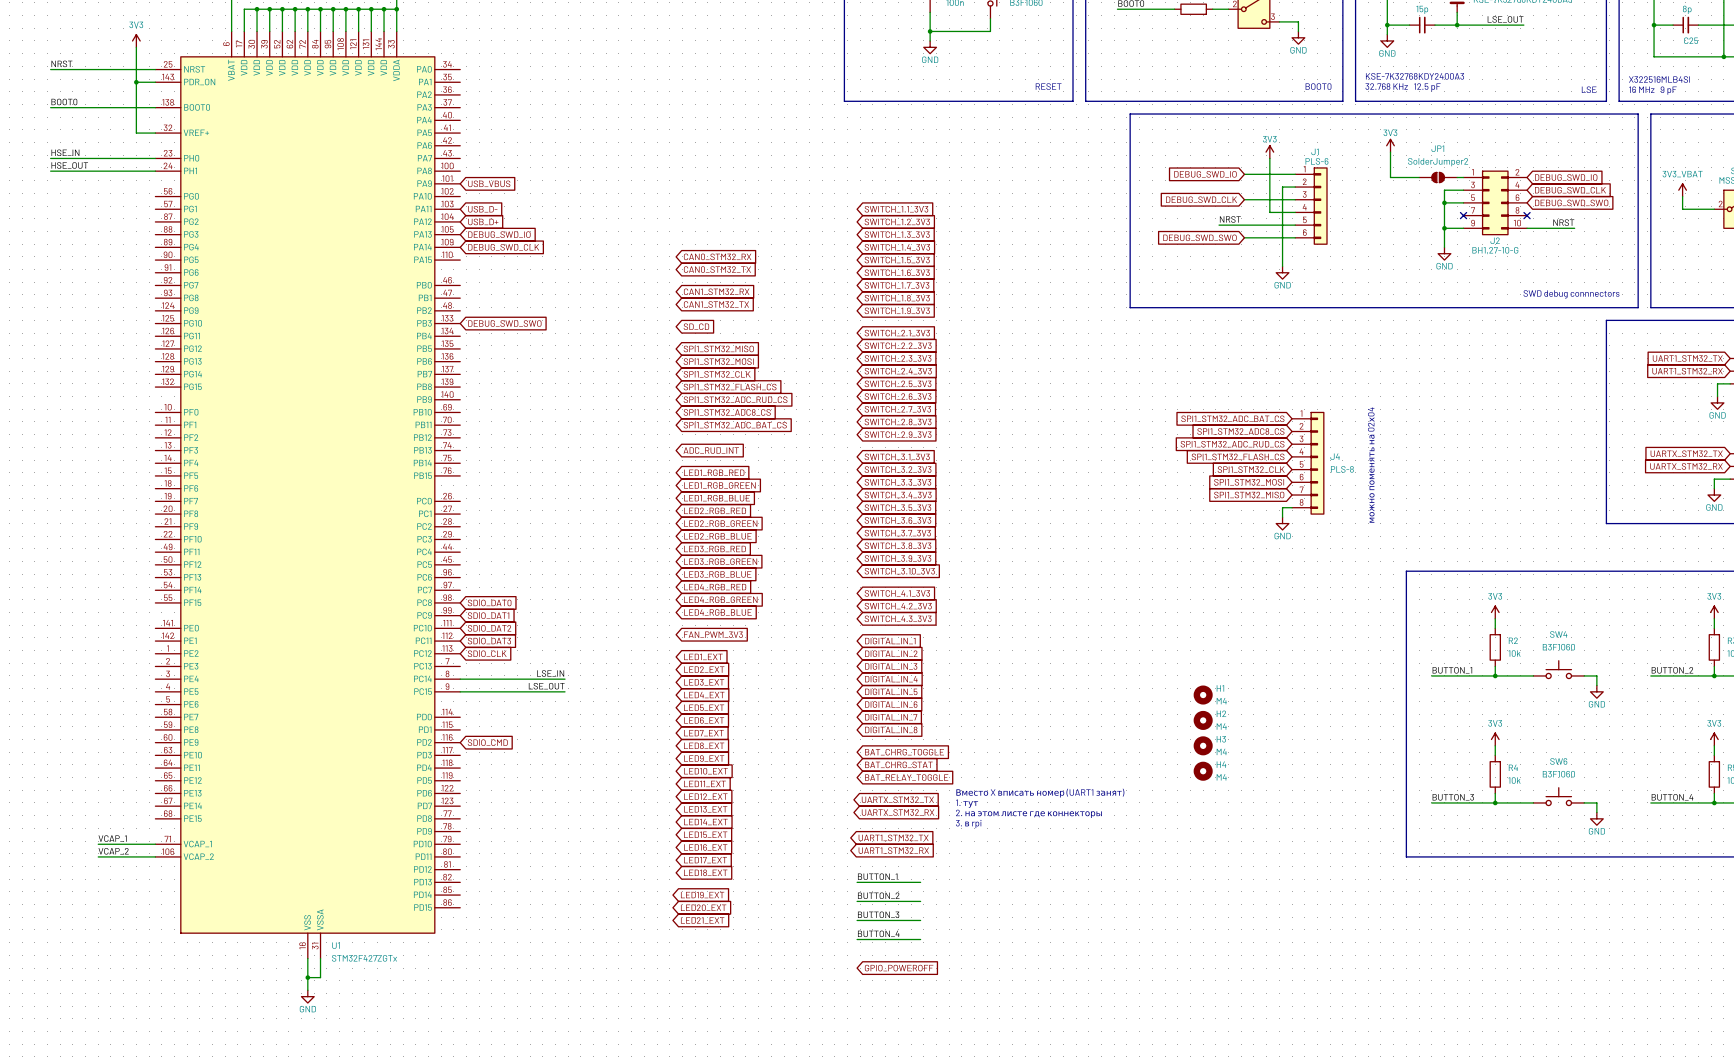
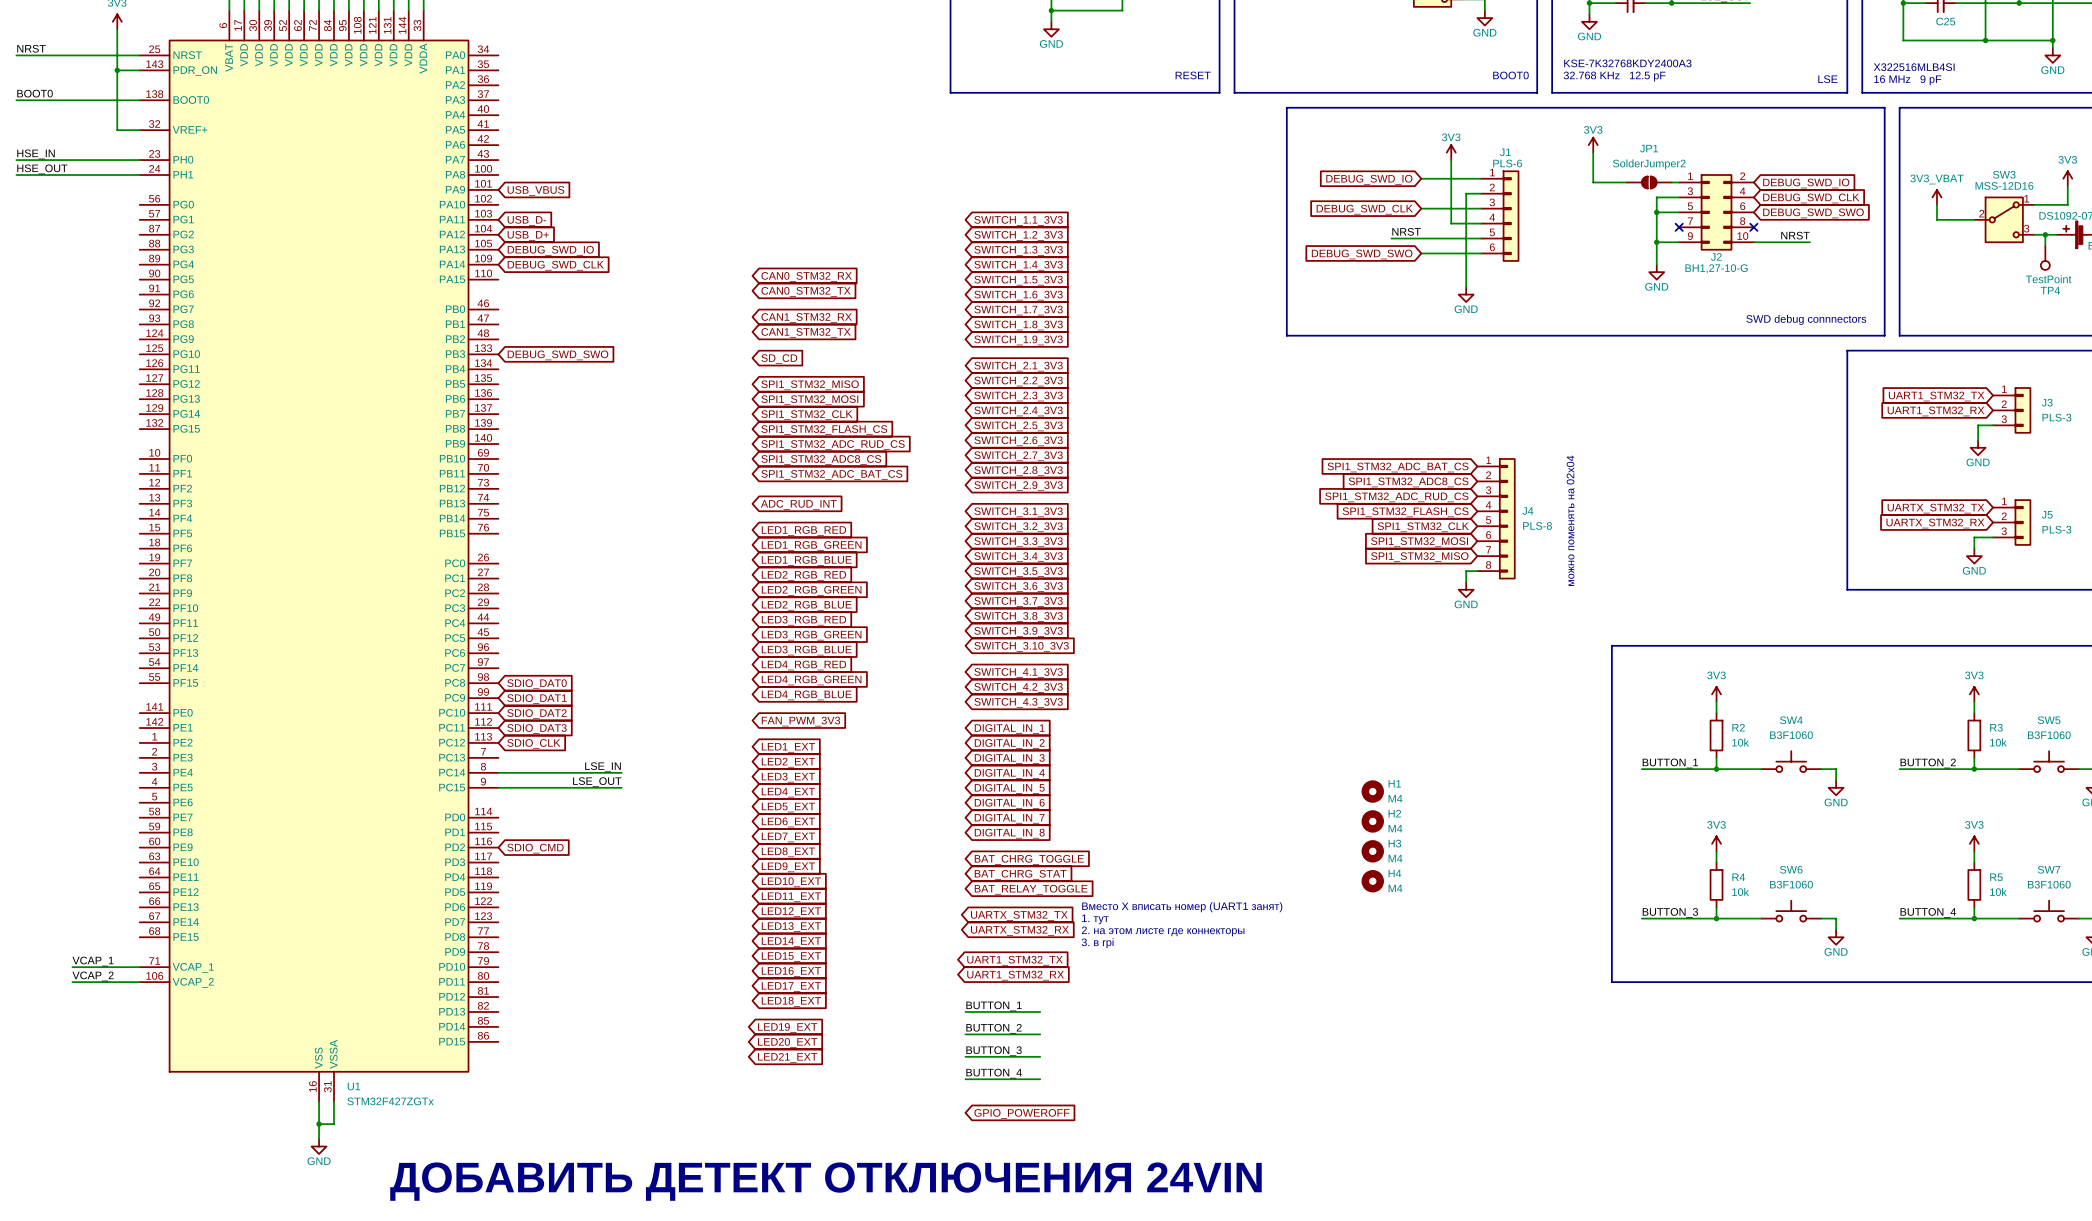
text: none -> ДОБАВИТЬ ДЕТЕКТ ОТКЛЮЧЕНИЯ 24VIN (825, 1181)

